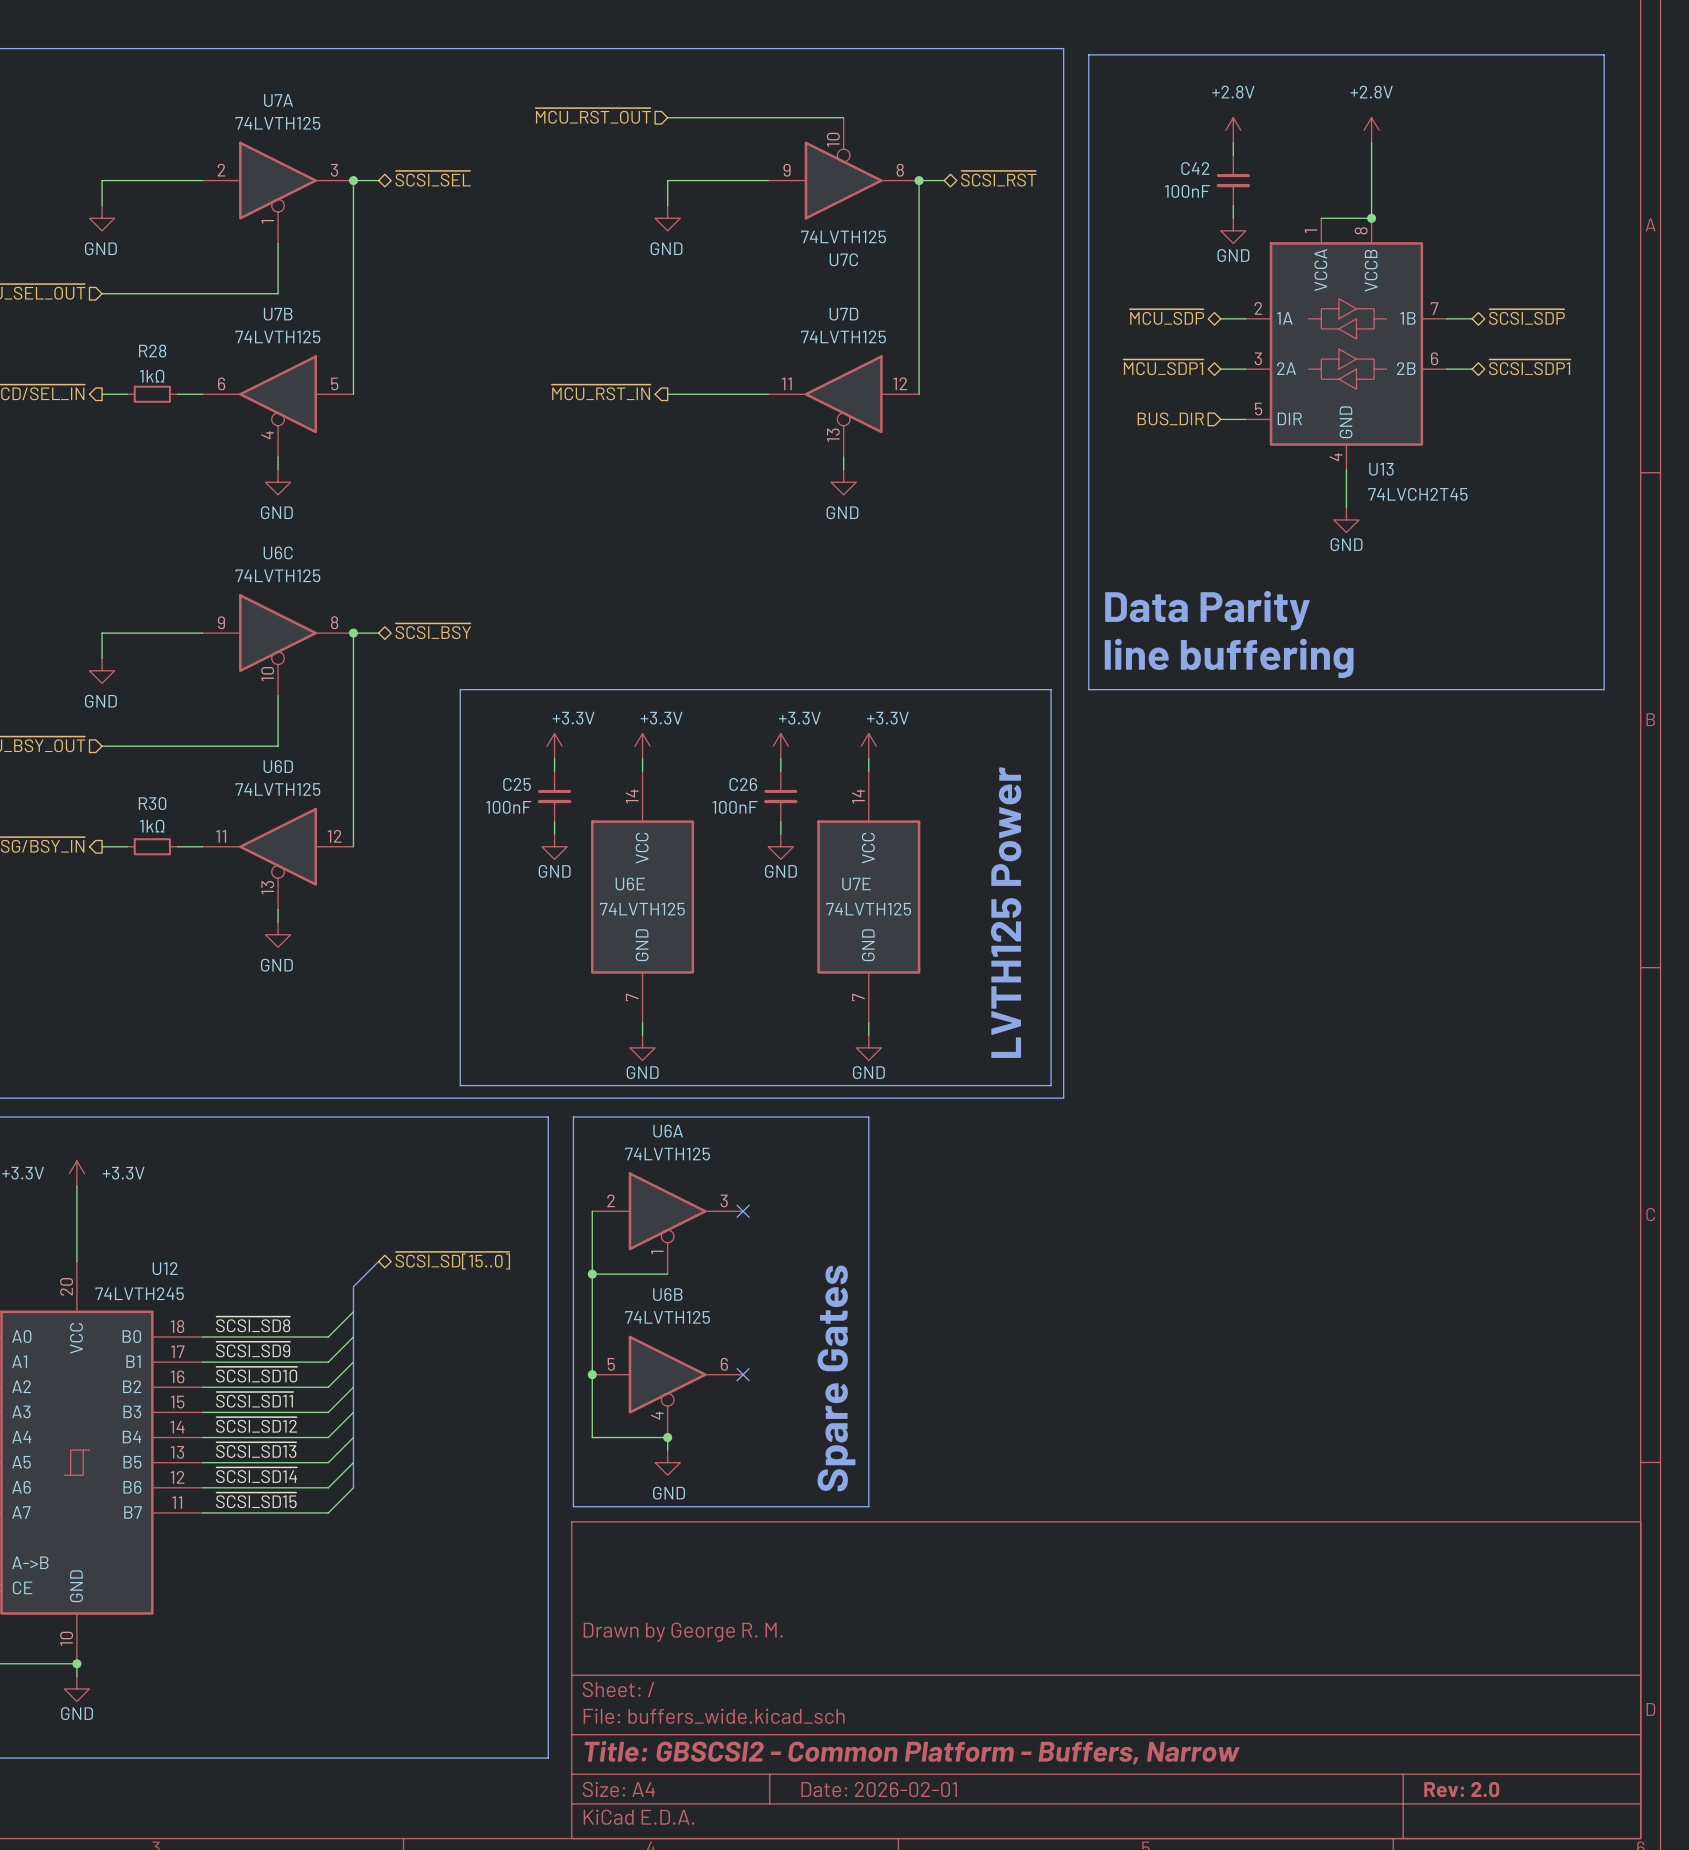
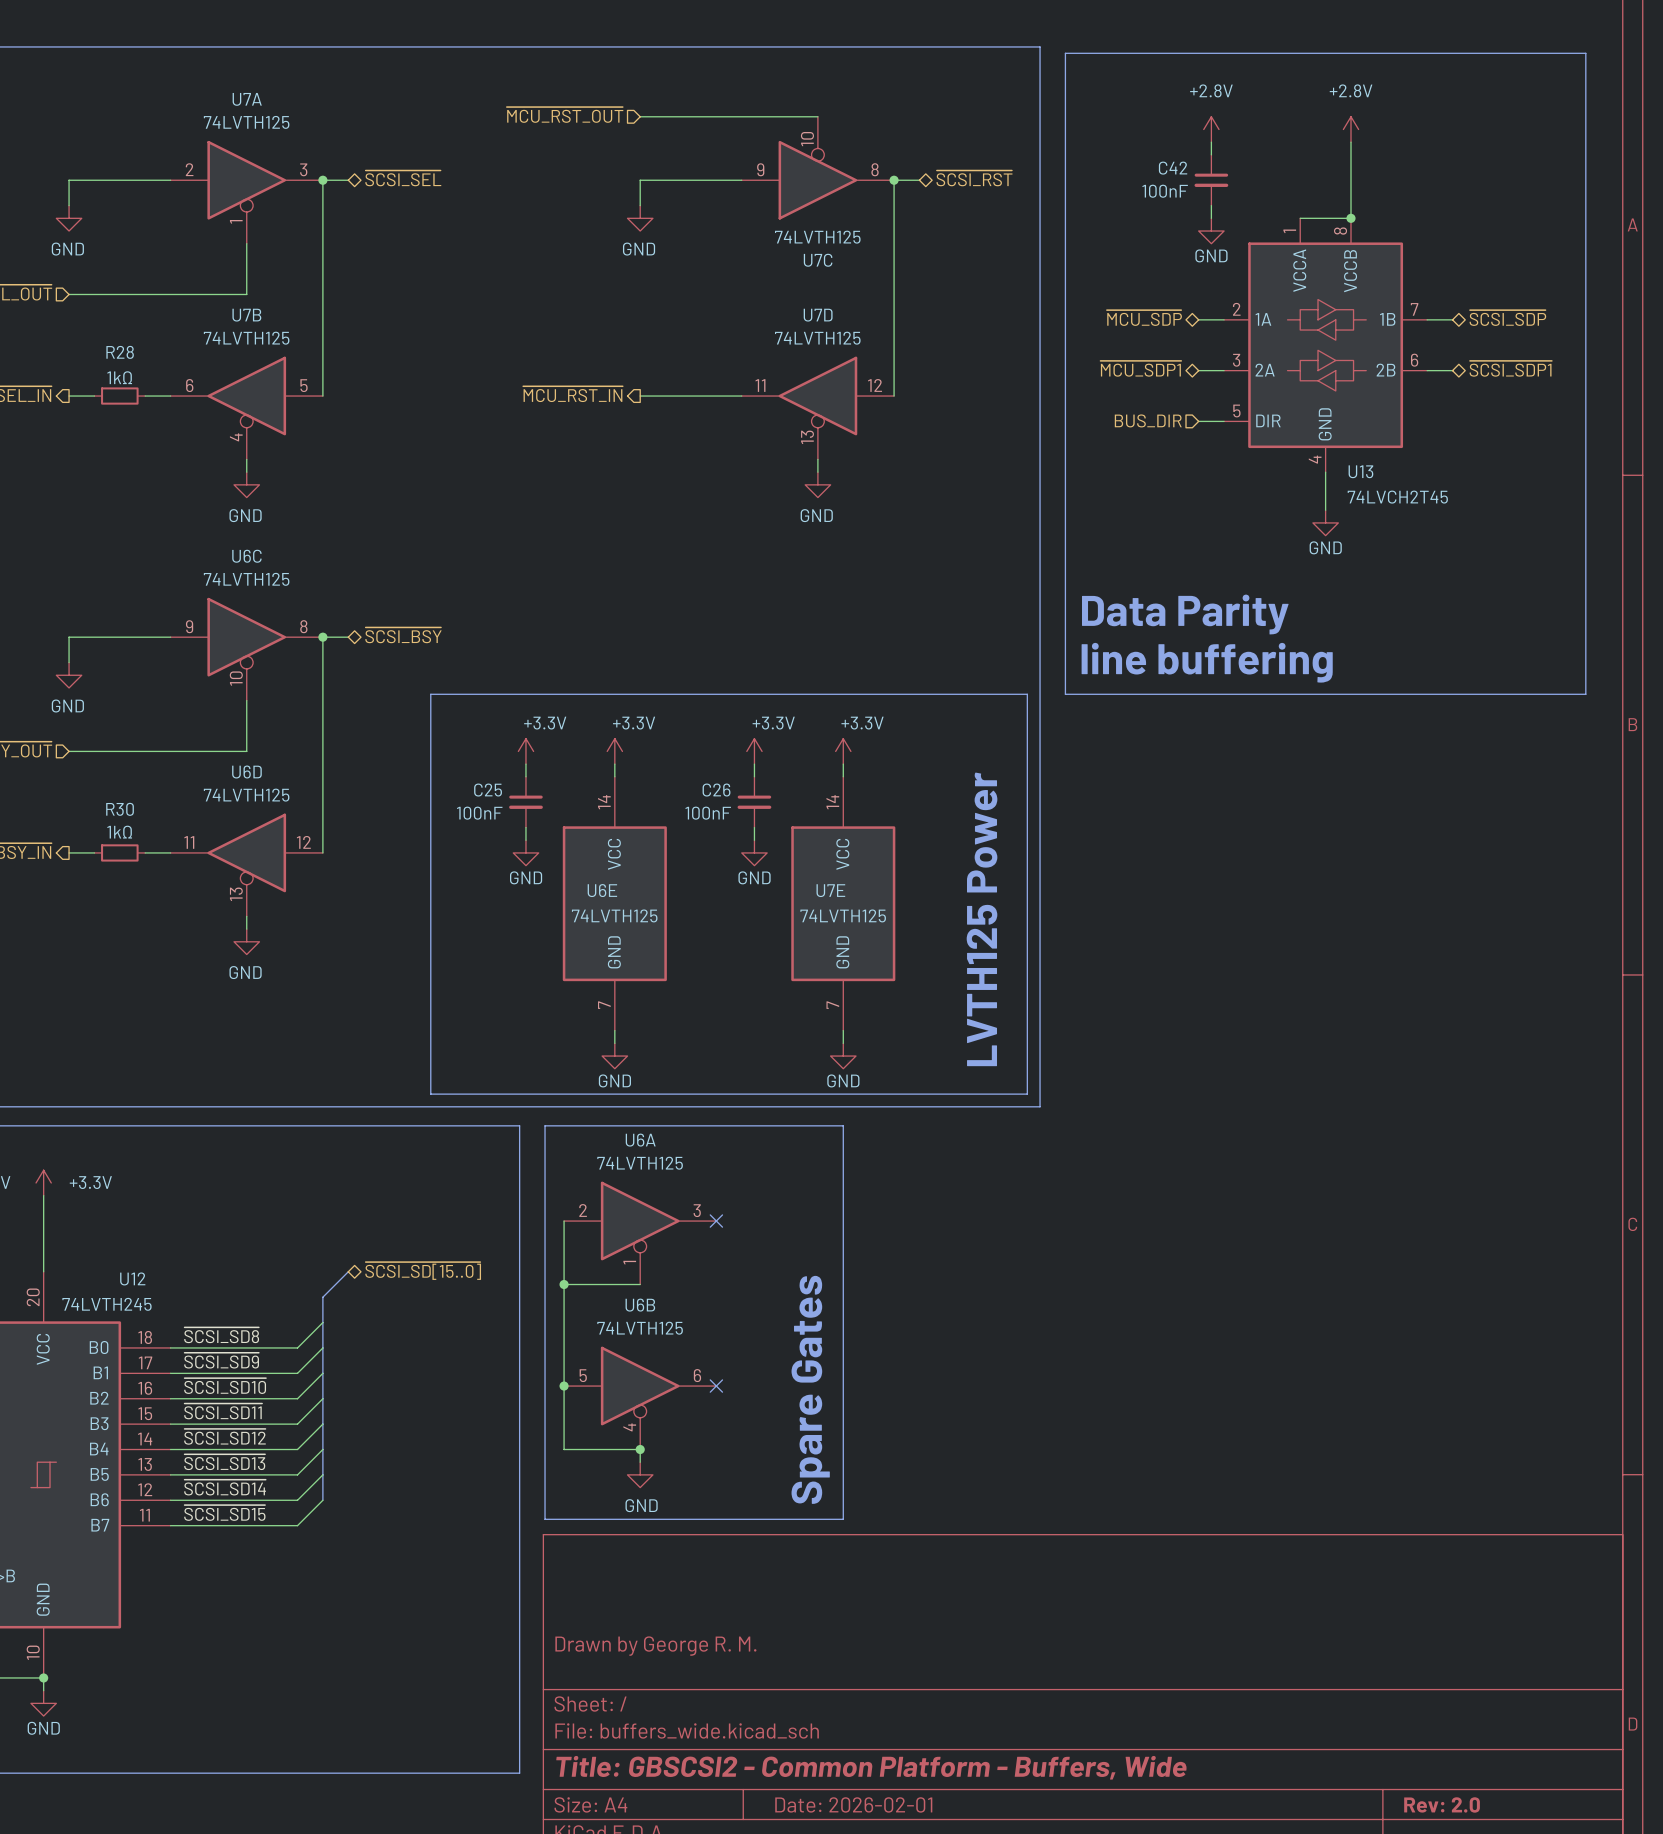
title block: Title: GBSCSI2 - Common Platform - Buffers, Narrow (912, 1752) -> Title: GBSCSI2 - Common Platform - Buffers, Wide (871, 1767)

